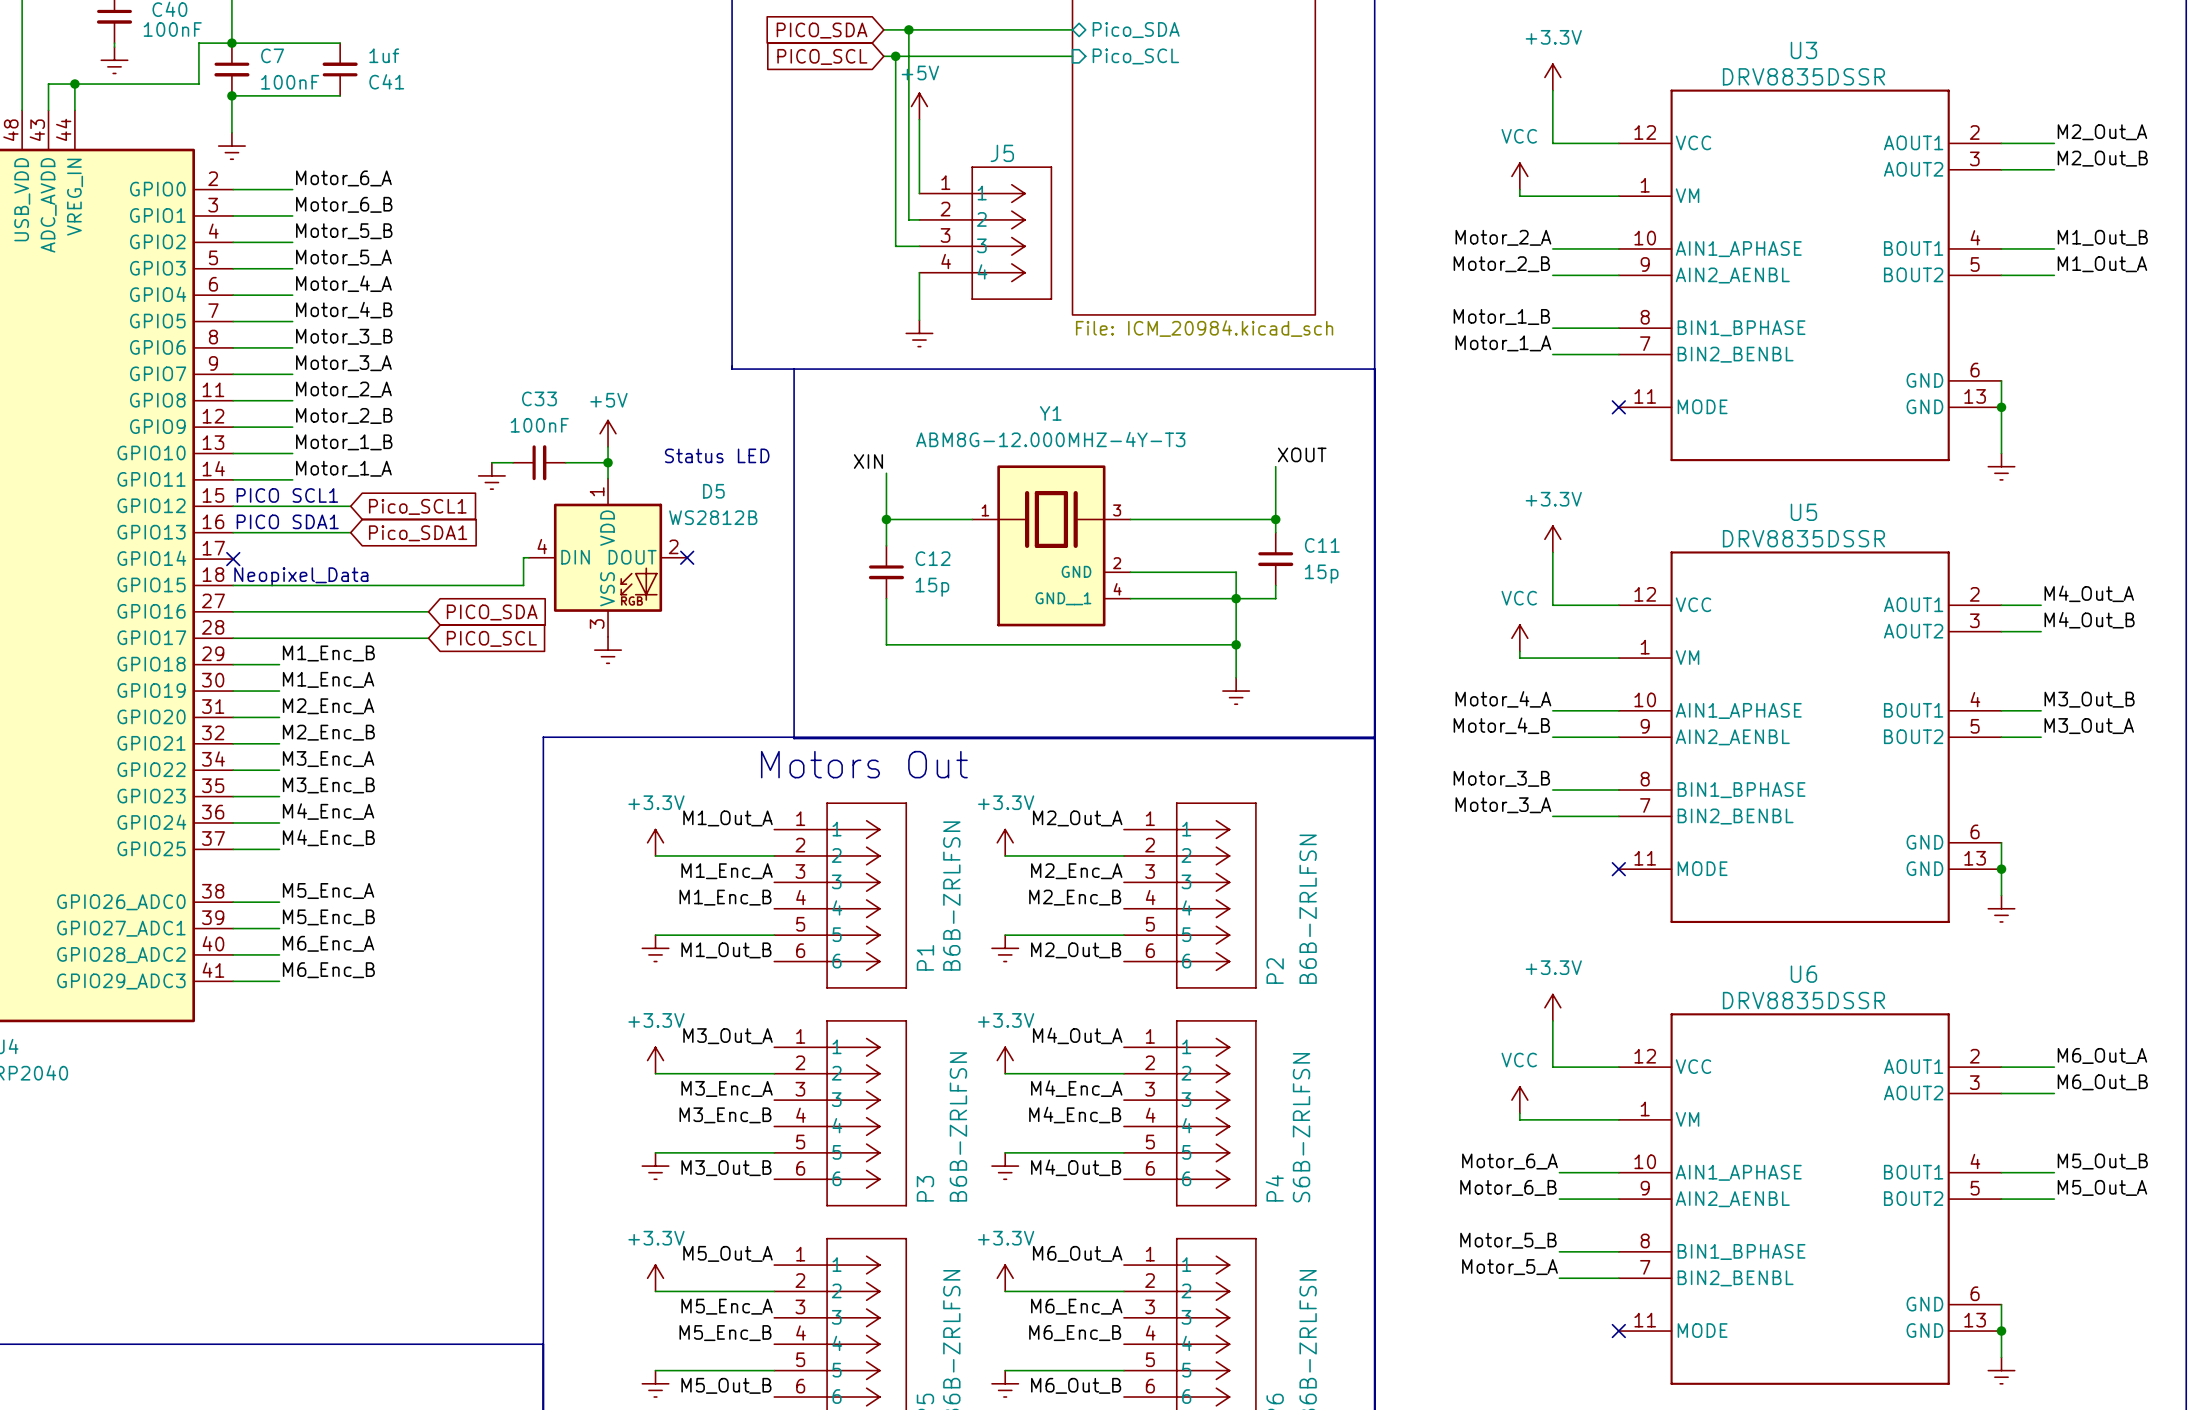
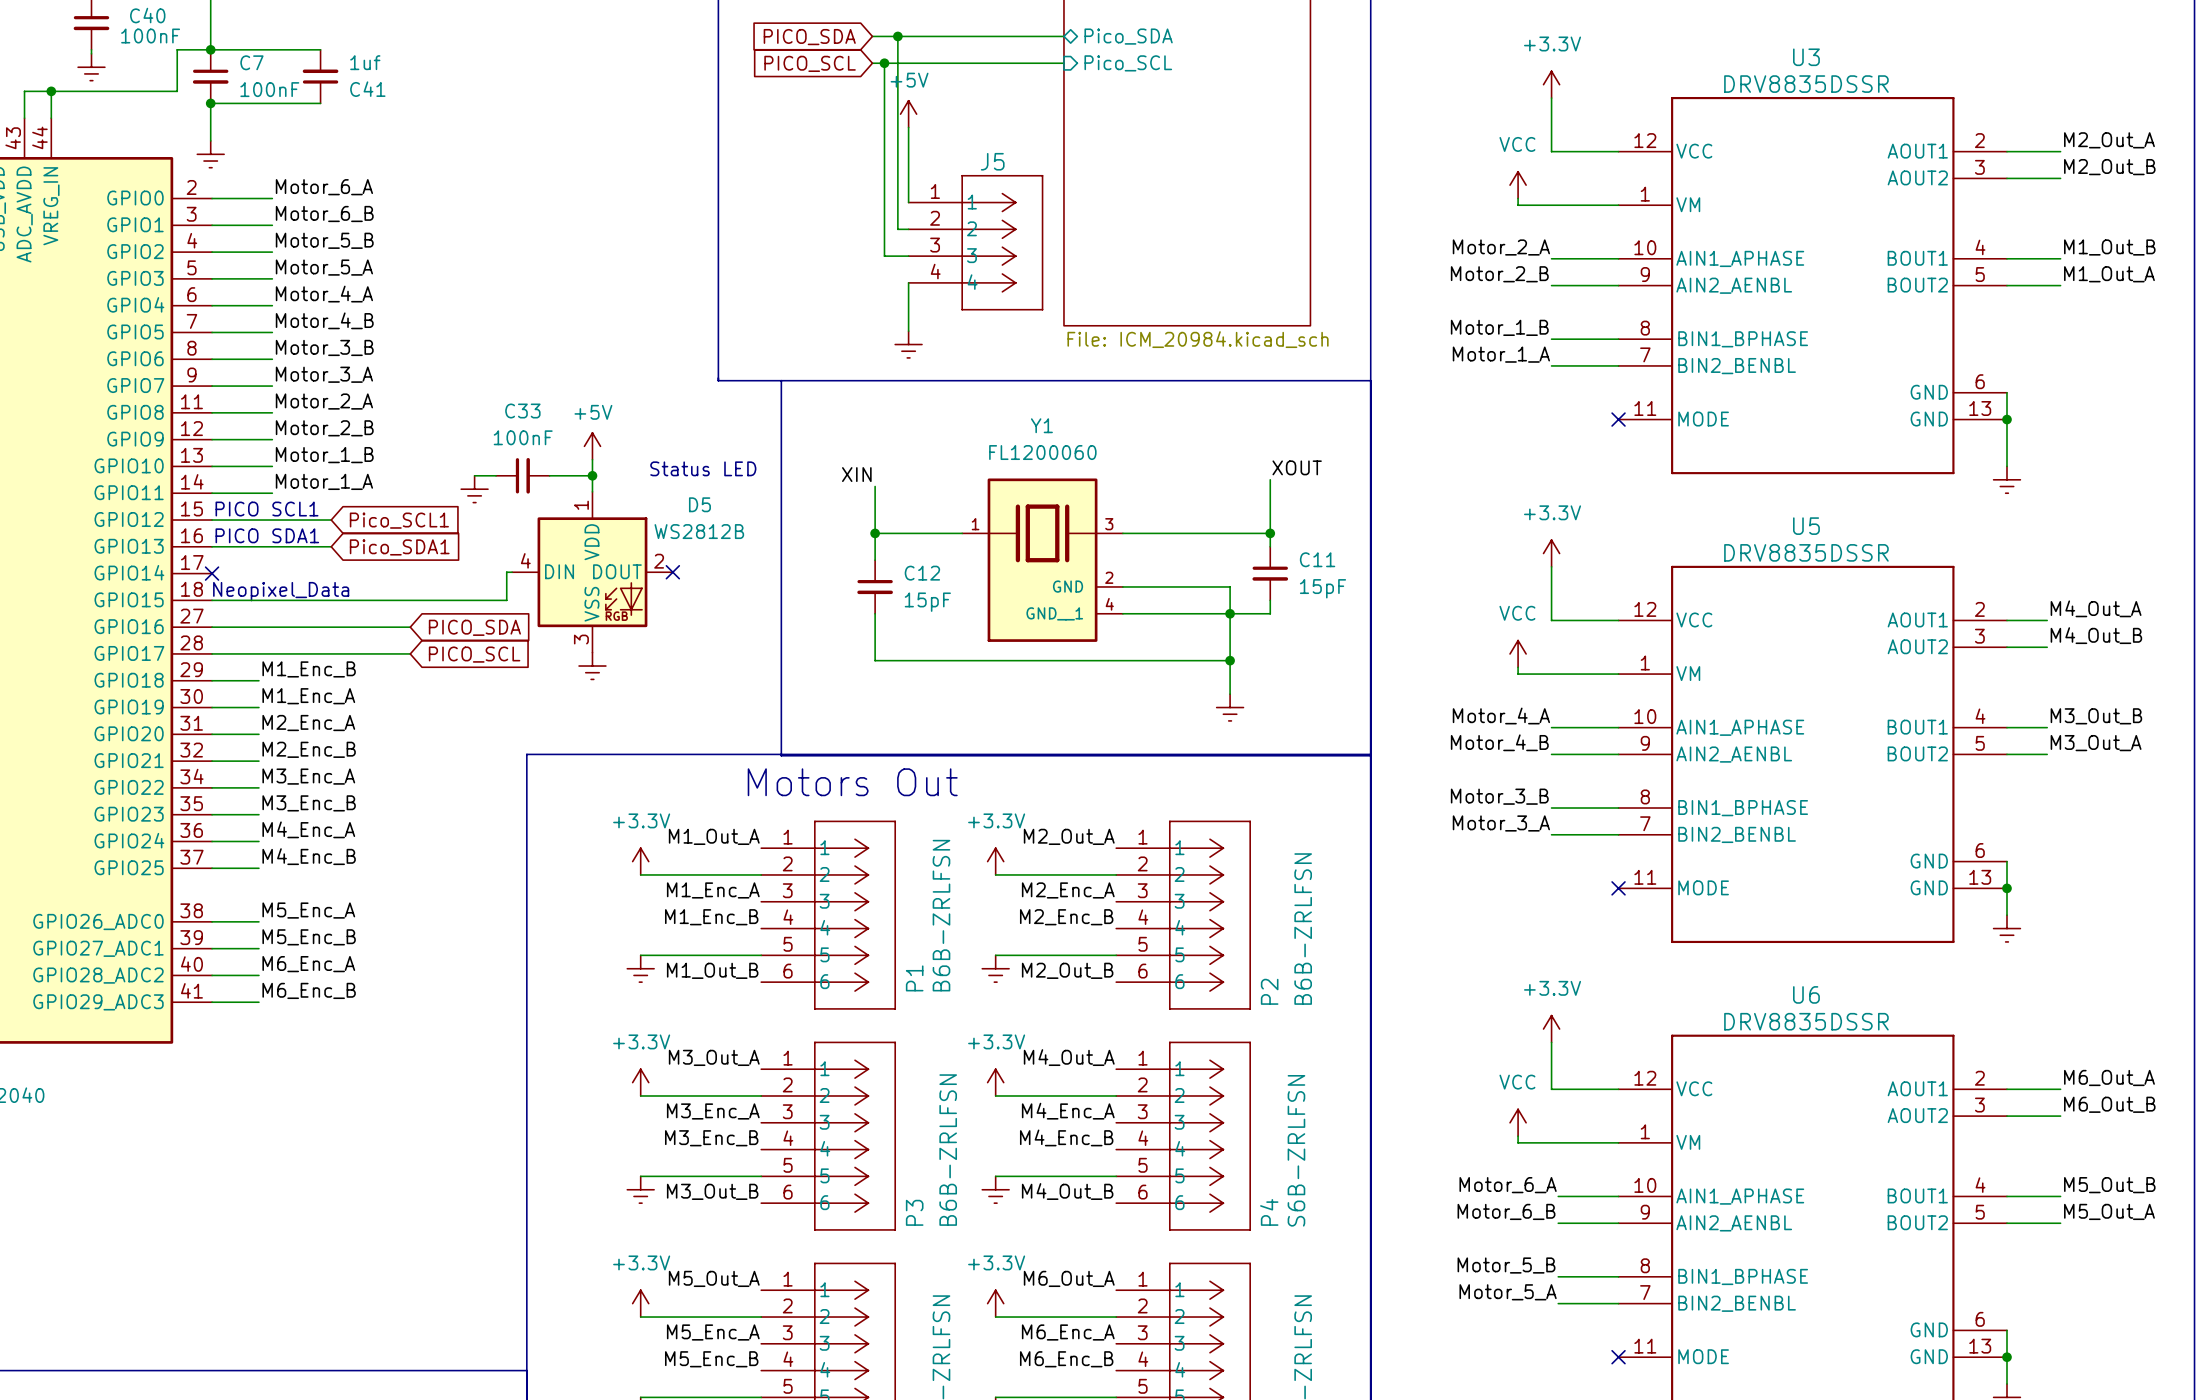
Y1 value: ABM8G-12.000MHZ-4Y-T3 (1050, 439) -> FL1200060 (1042, 452)
C11 value: 15p (1321, 574) -> 15pF (1322, 588)
C12 value: 15p (932, 587) -> 15pF (927, 602)

